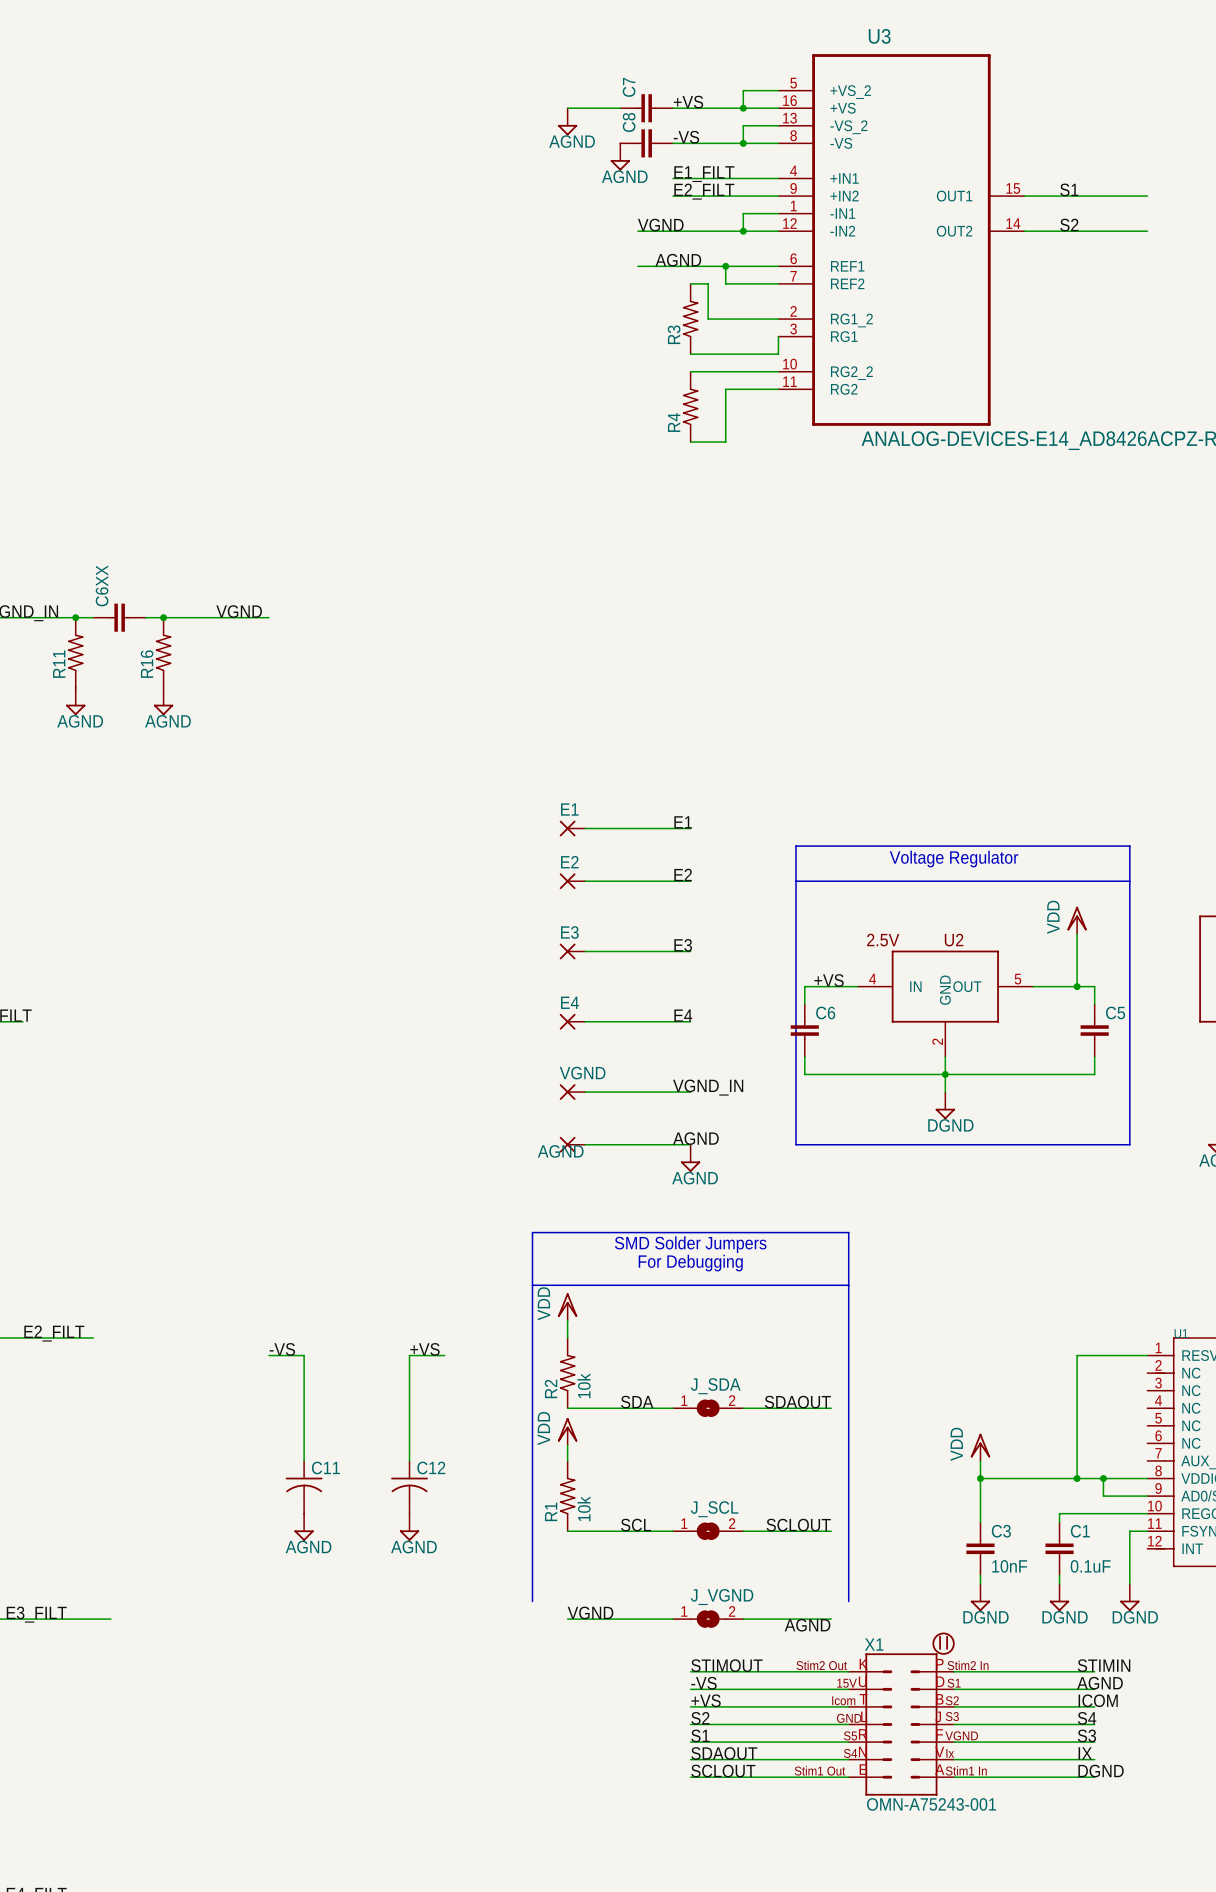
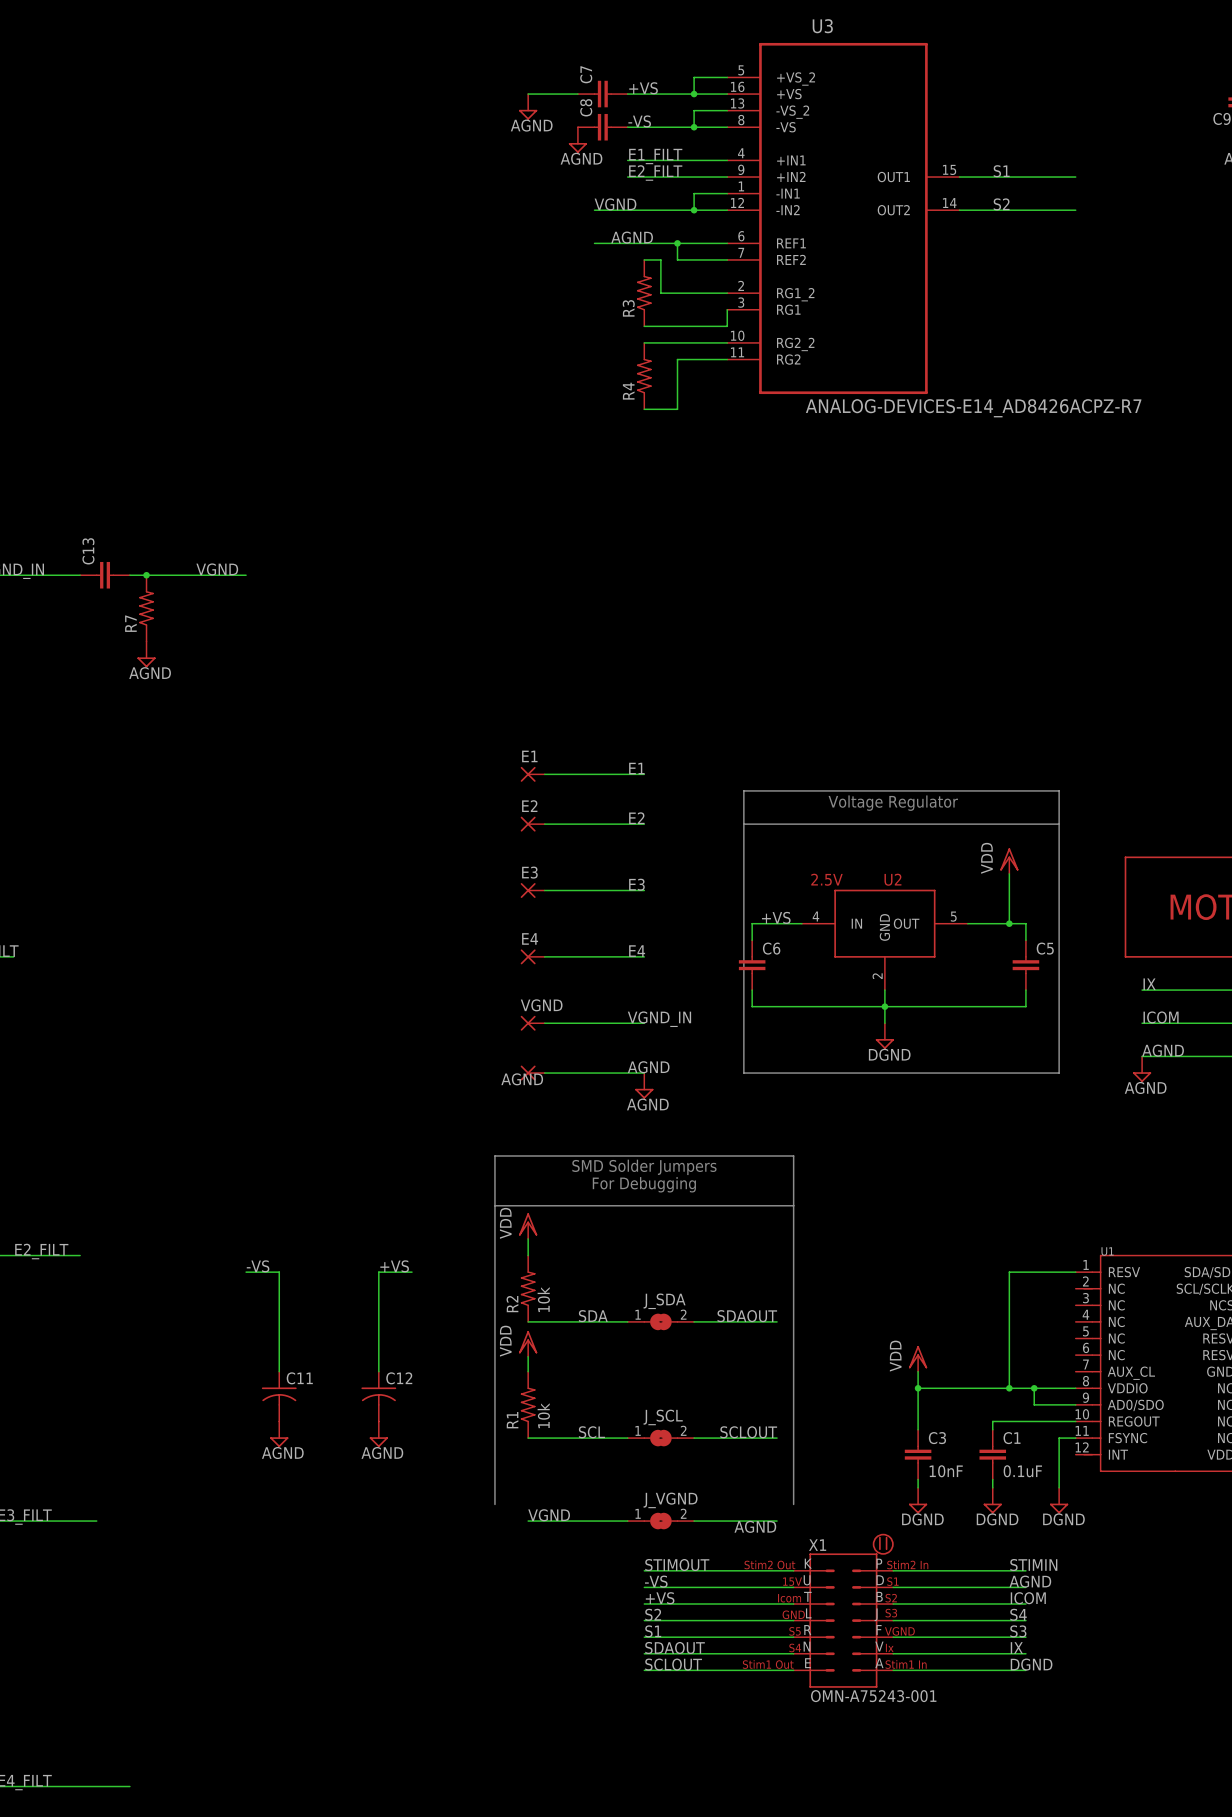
C6XX name: C6XX (102, 585) -> C13 (88, 551)
junction: (75, 617) -> none
R11: (75, 652) -> none
R16 name: R16 (147, 664) -> R7 (130, 623)
power symbol: AGND (75, 701) -> none

